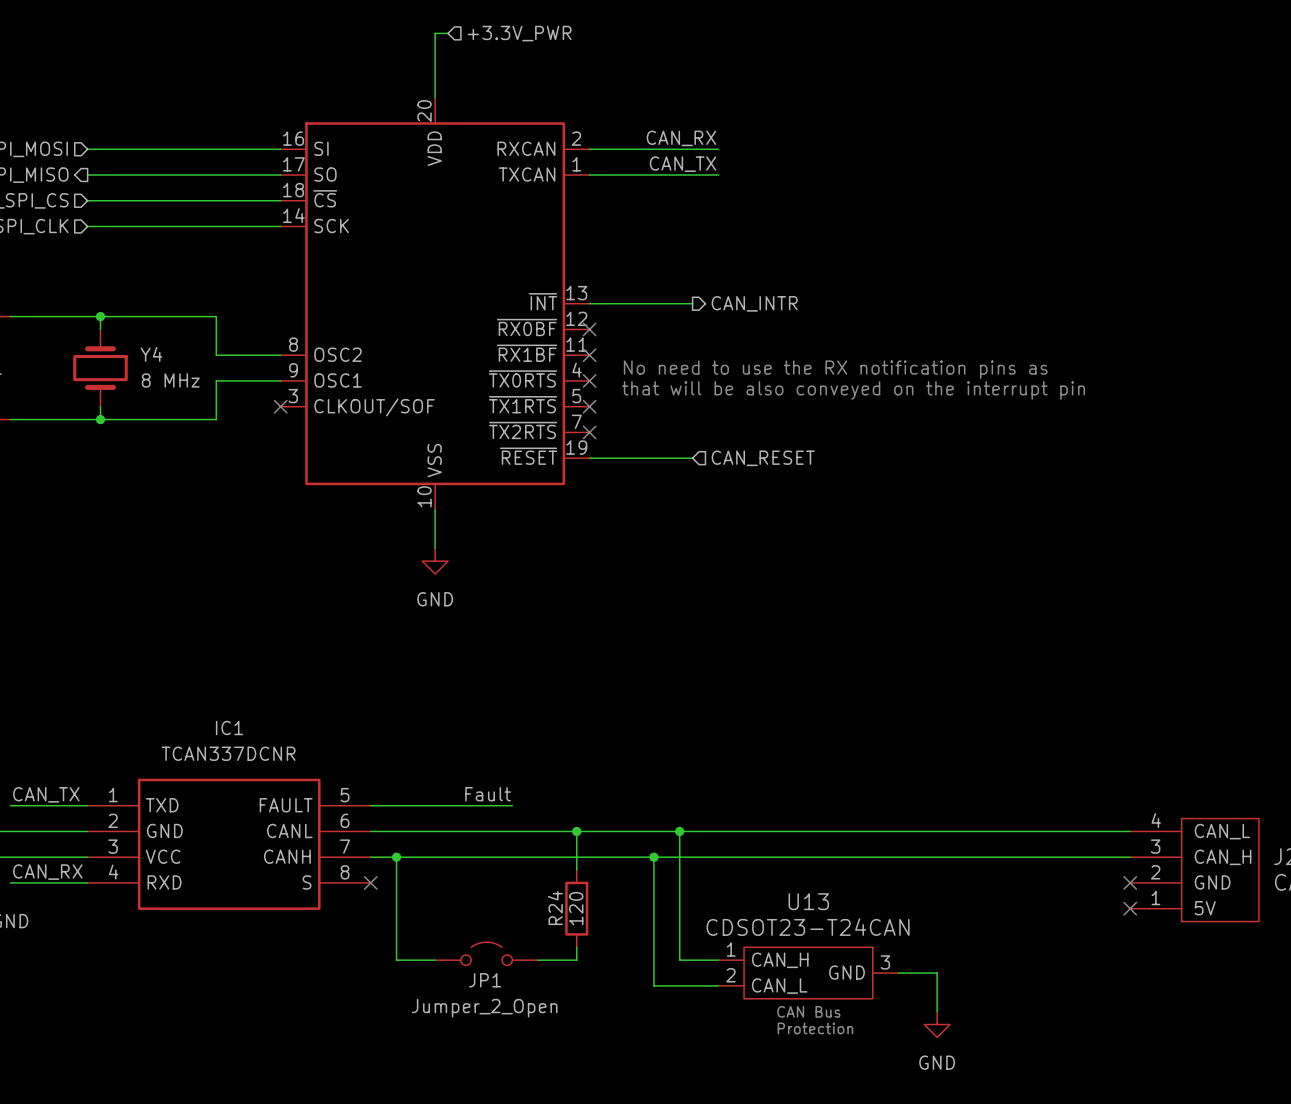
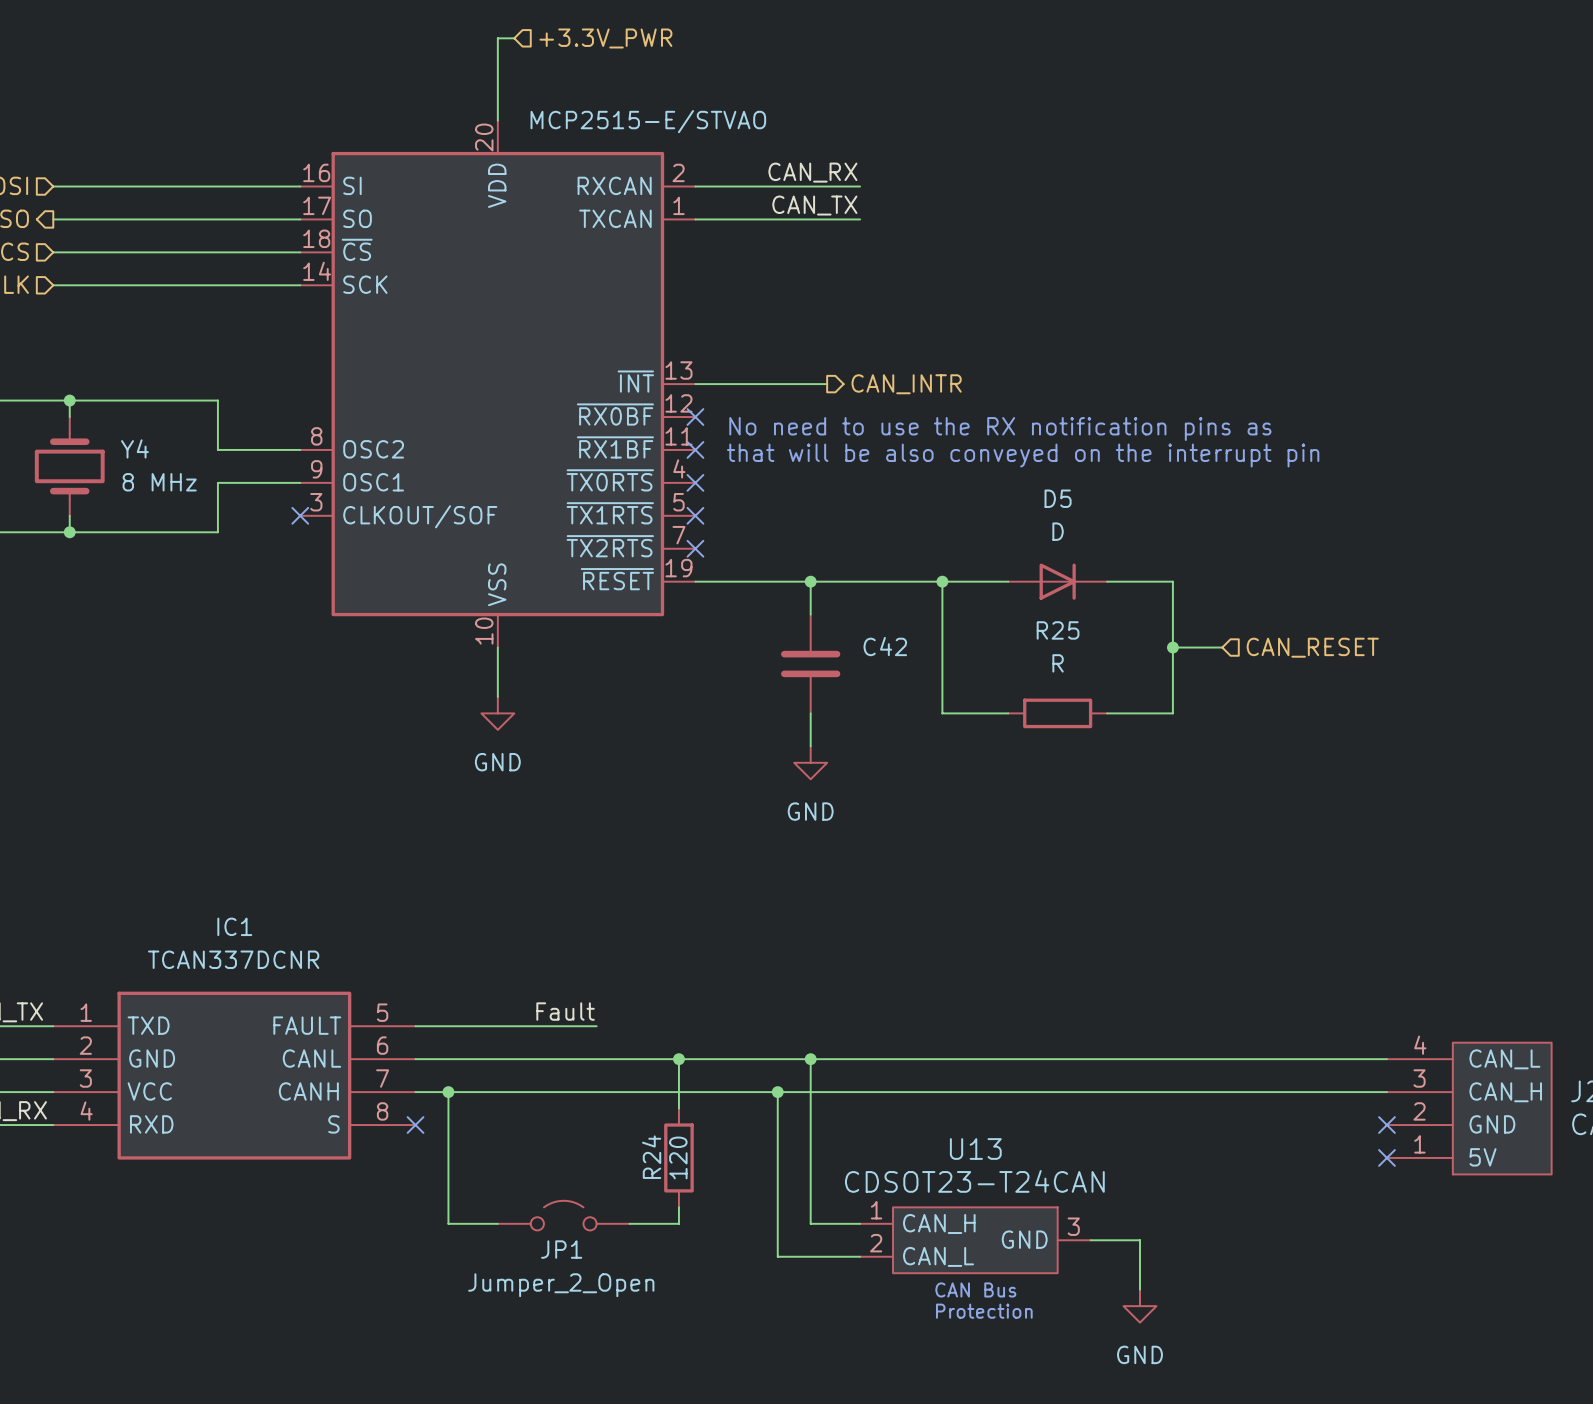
part value: none -> MCP2515-E/STVAO (648, 121)
text position: No need to use the RX notification pins as (835, 369) -> No need to use the RX notification pins as (1000, 429)
text position: that will be also conveyed on the interrupt pin (853, 390) -> that will be also conveyed on the interrupt pin (1023, 455)
wire: none -> (810, 581) (810, 614)
junction: none -> (810, 581)
wire: none -> (827, 581) (1008, 581)
hierarchical label: CAN_RESET (763, 458) -> none
wire: none -> (942, 581) (942, 713) (1008, 713)
junction: none -> (942, 581)
D5: none -> D (1057, 581)
wire: none -> (1107, 581) (1172, 581) (1172, 713) (1107, 713)
wire: none -> (1172, 647) (1222, 647)
junction: none -> (1172, 647)
hierarchical label: none -> CAN_RESET (1312, 647)
C42: none -> (810, 664)
wire: none -> (810, 713) (810, 746)
R25: none -> R (1057, 713)
power symbol: none -> GND (810, 762)

